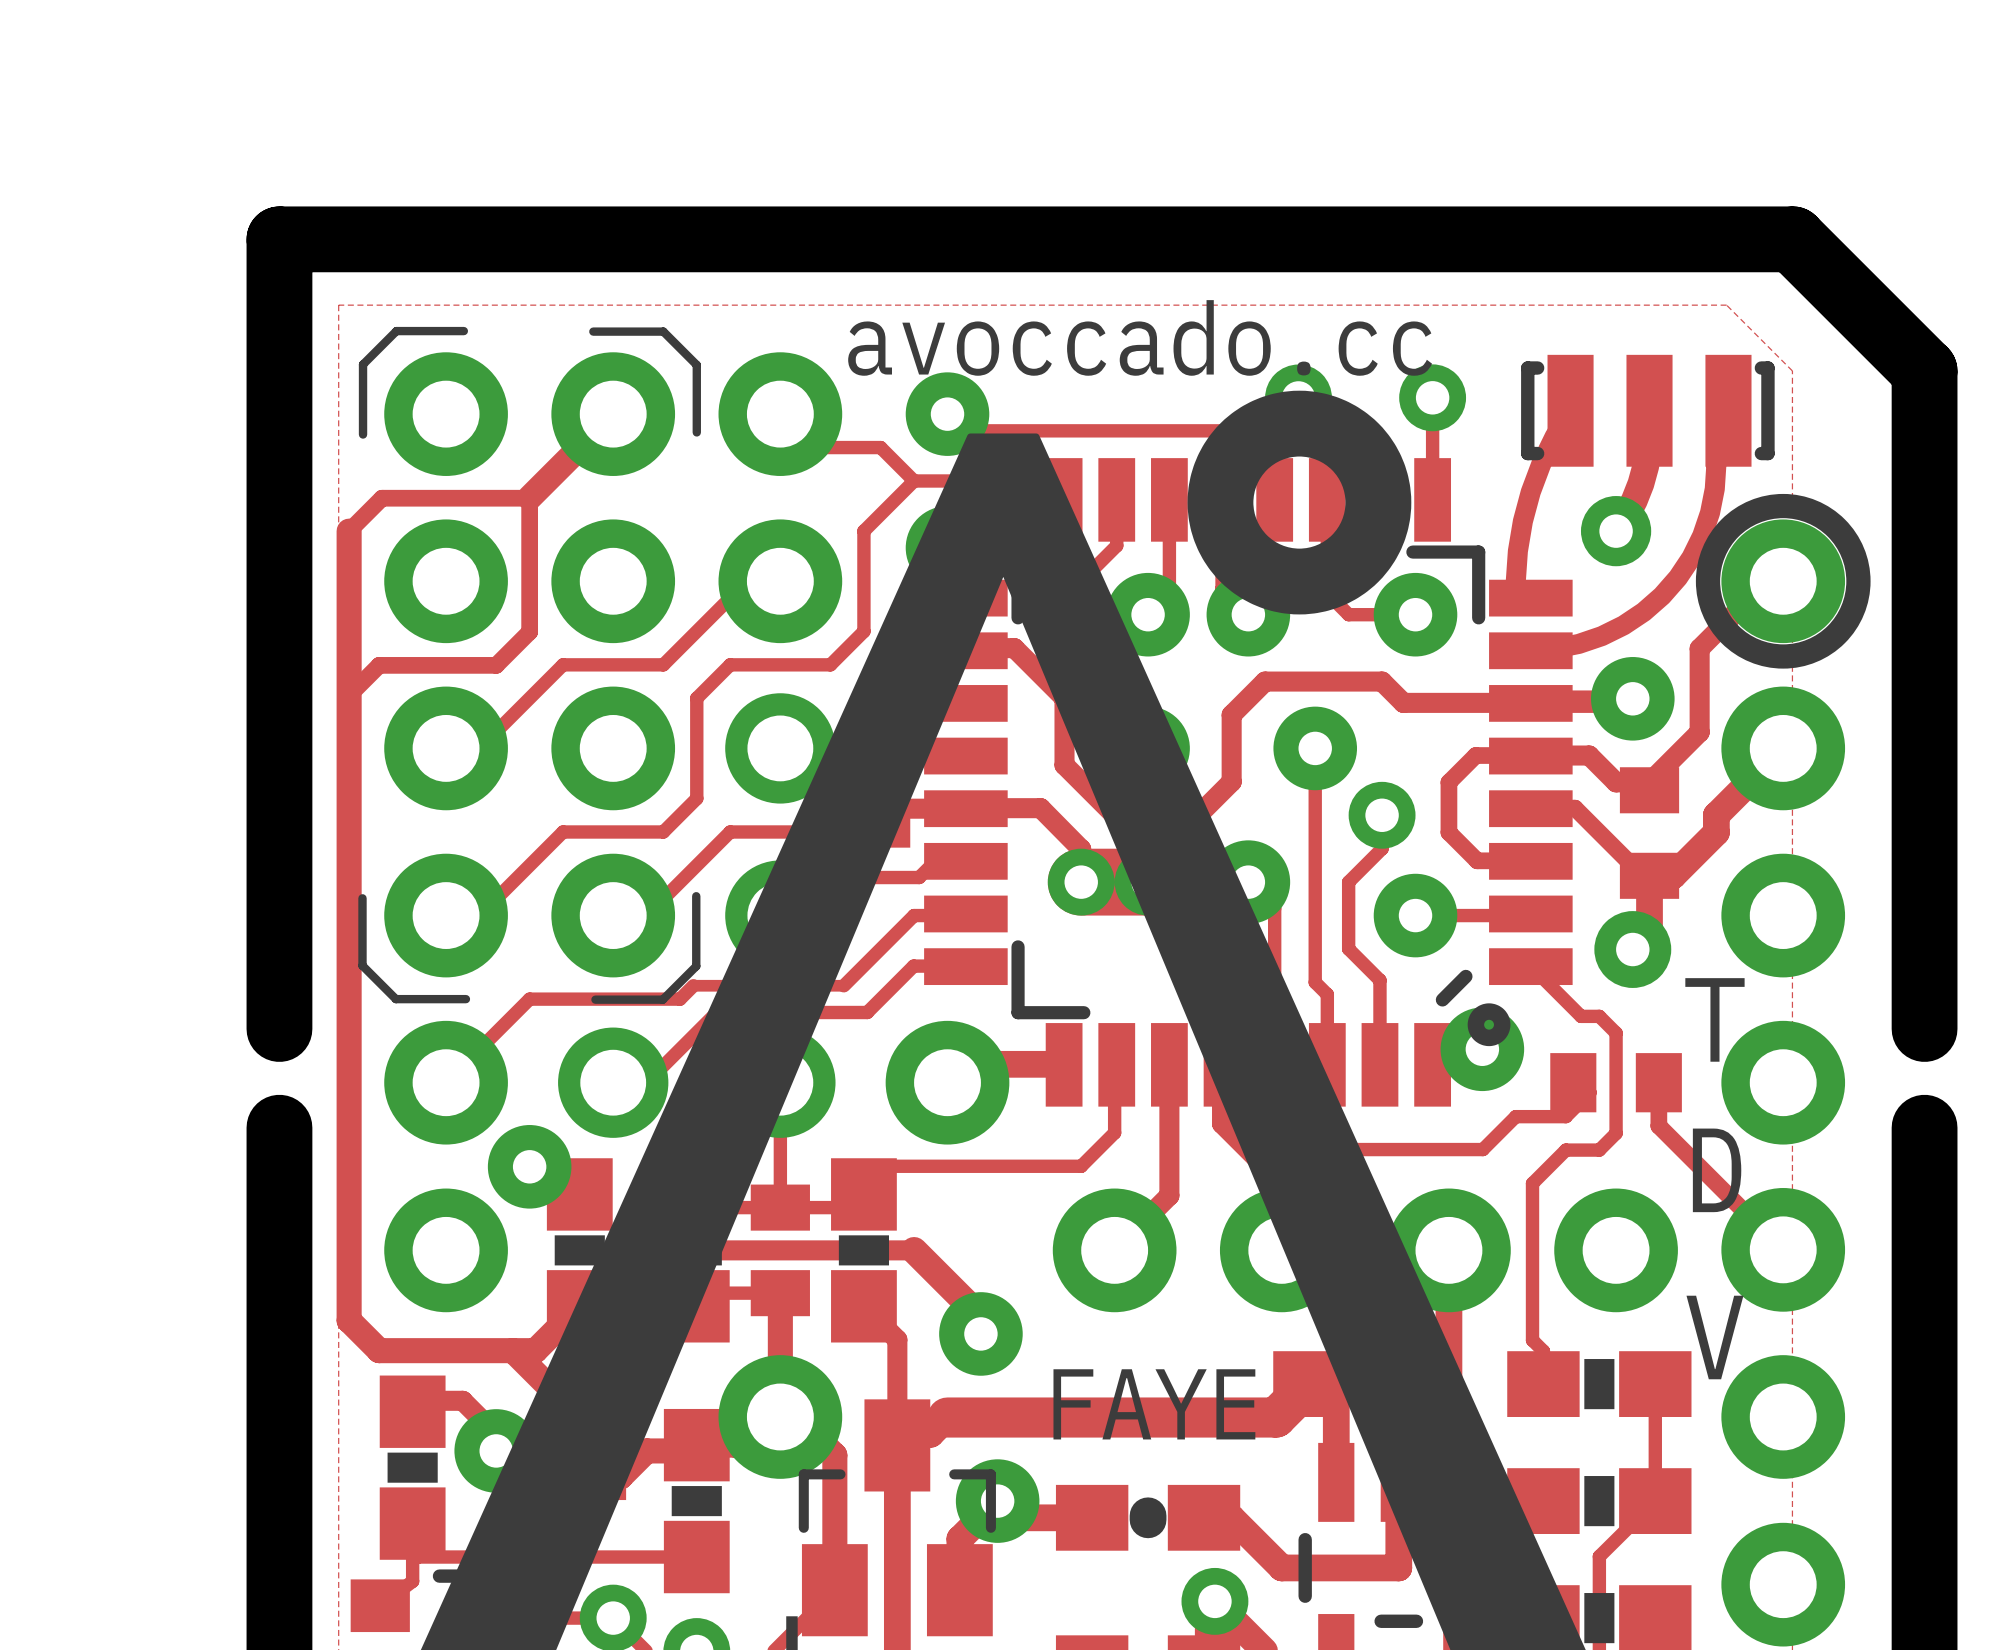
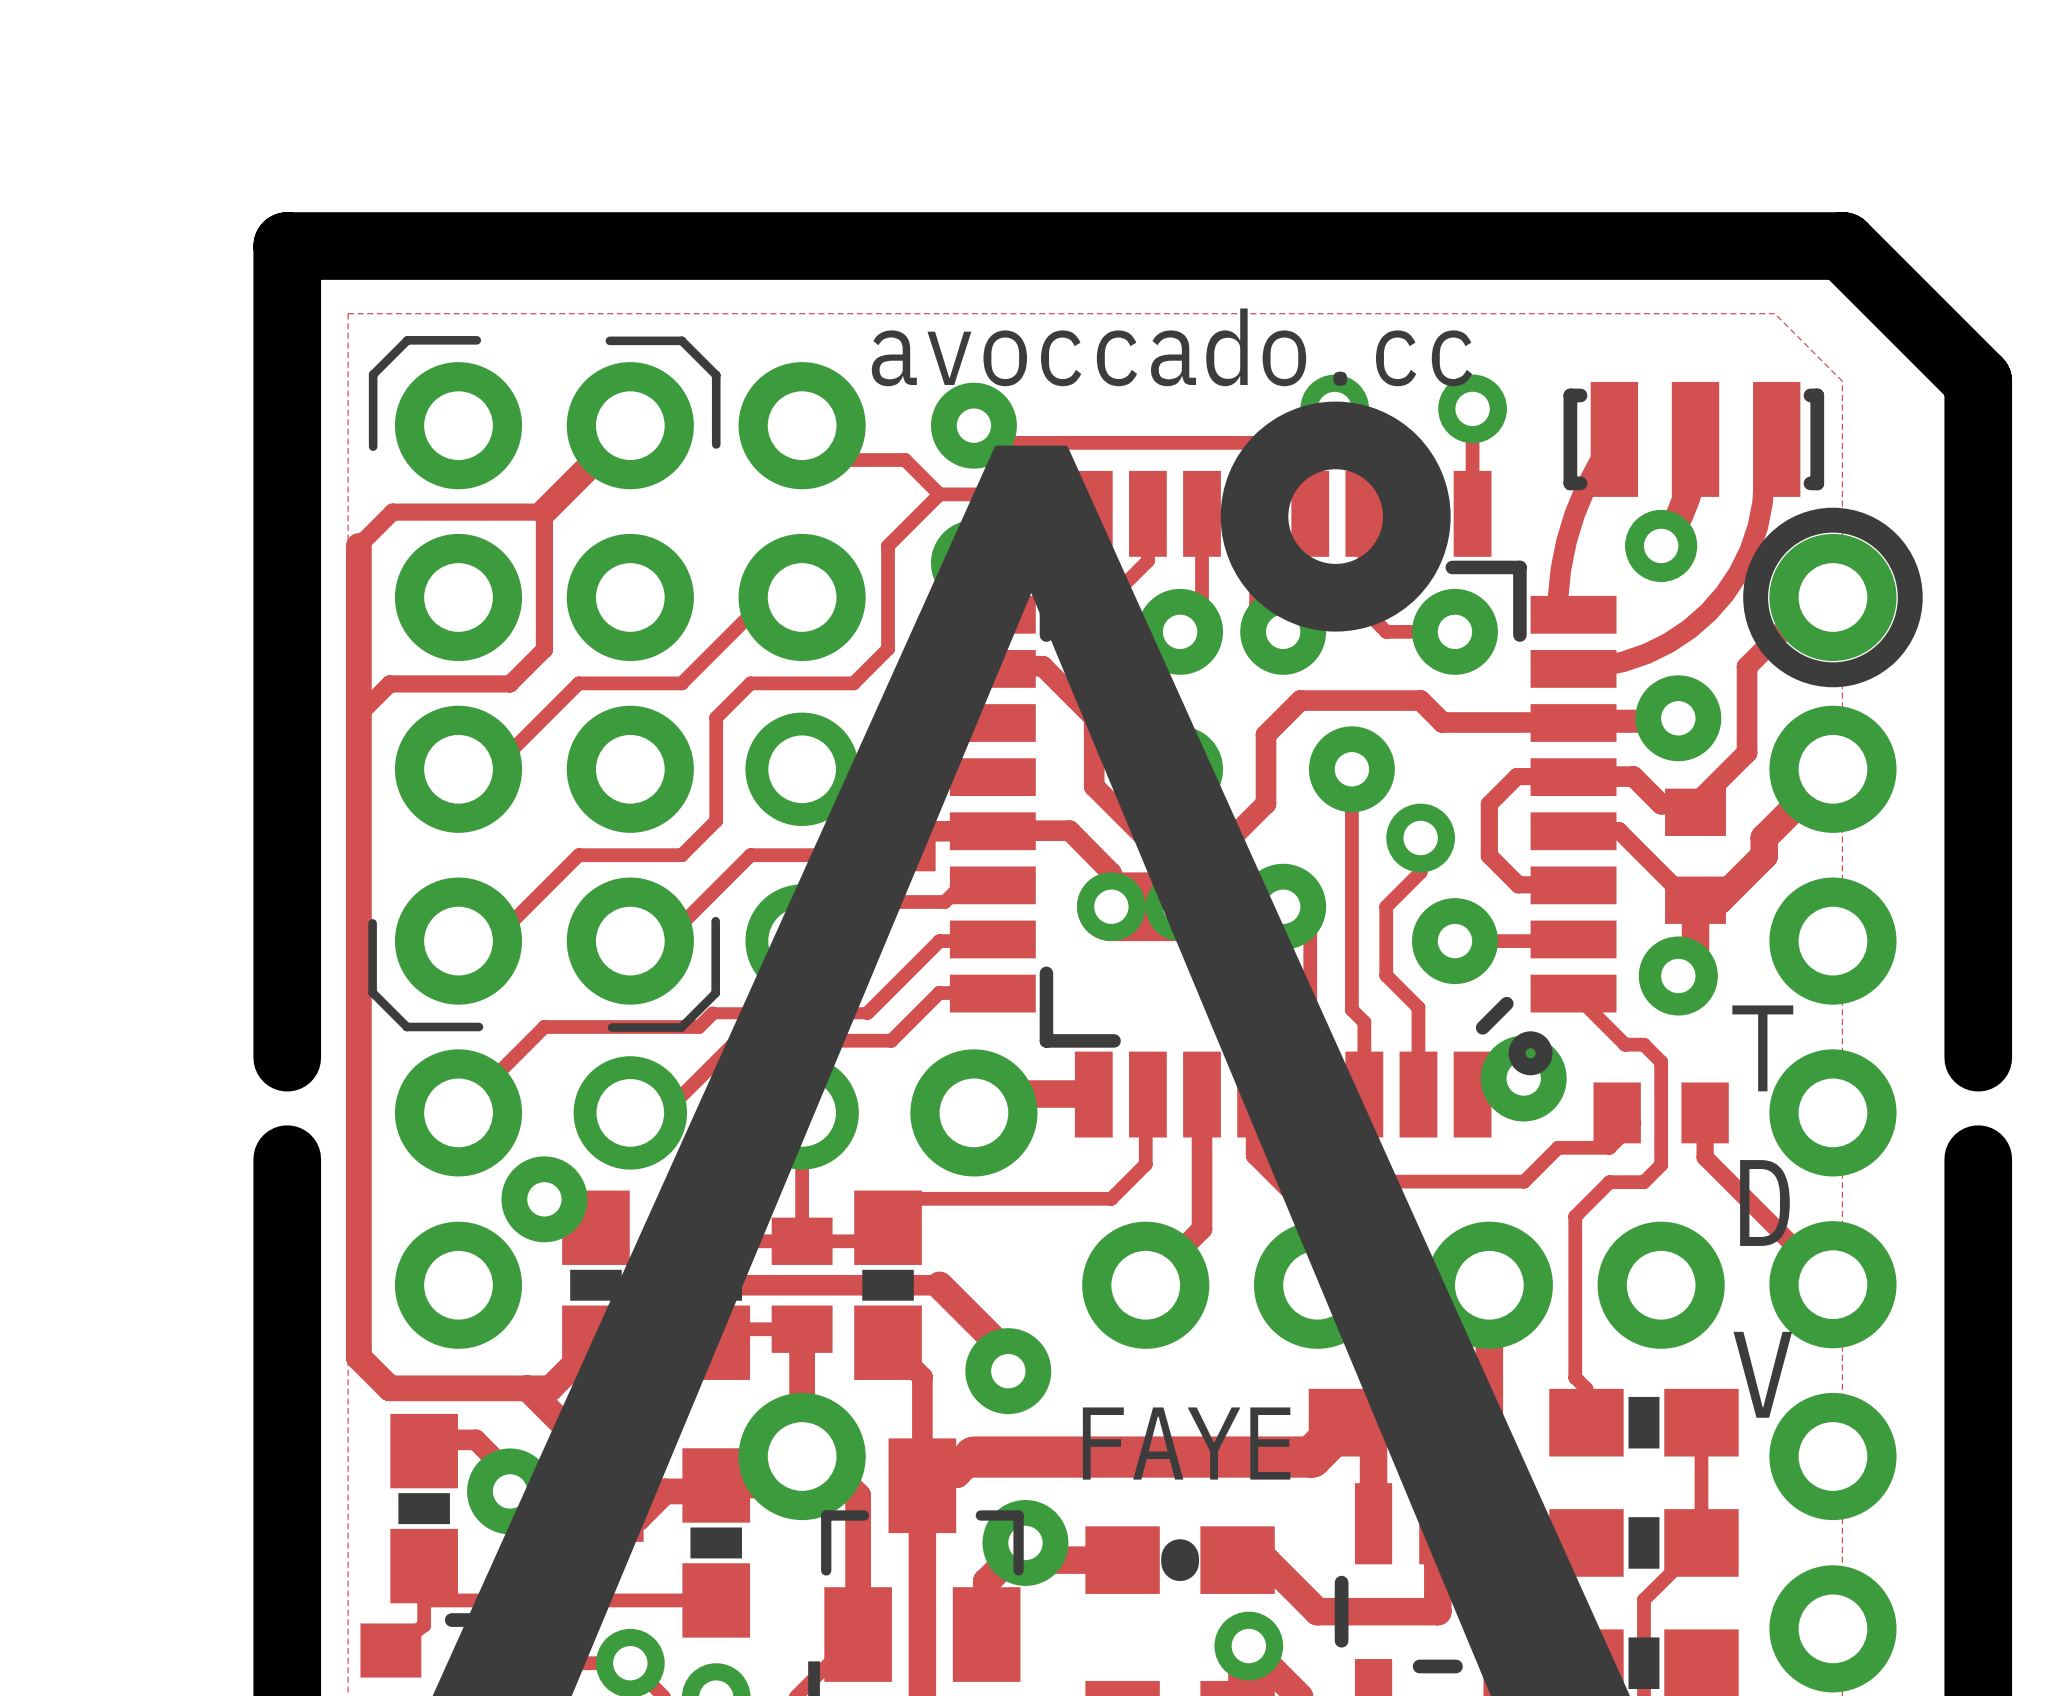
track: (1570, 410) (1541, 463) (1530, 492) (1522, 521) (1515, 581) -> (1614, 439) (1585, 488) (1574, 514) (1566, 541) (1558, 597)
part position: (1647, 410) -> (1693, 439)

